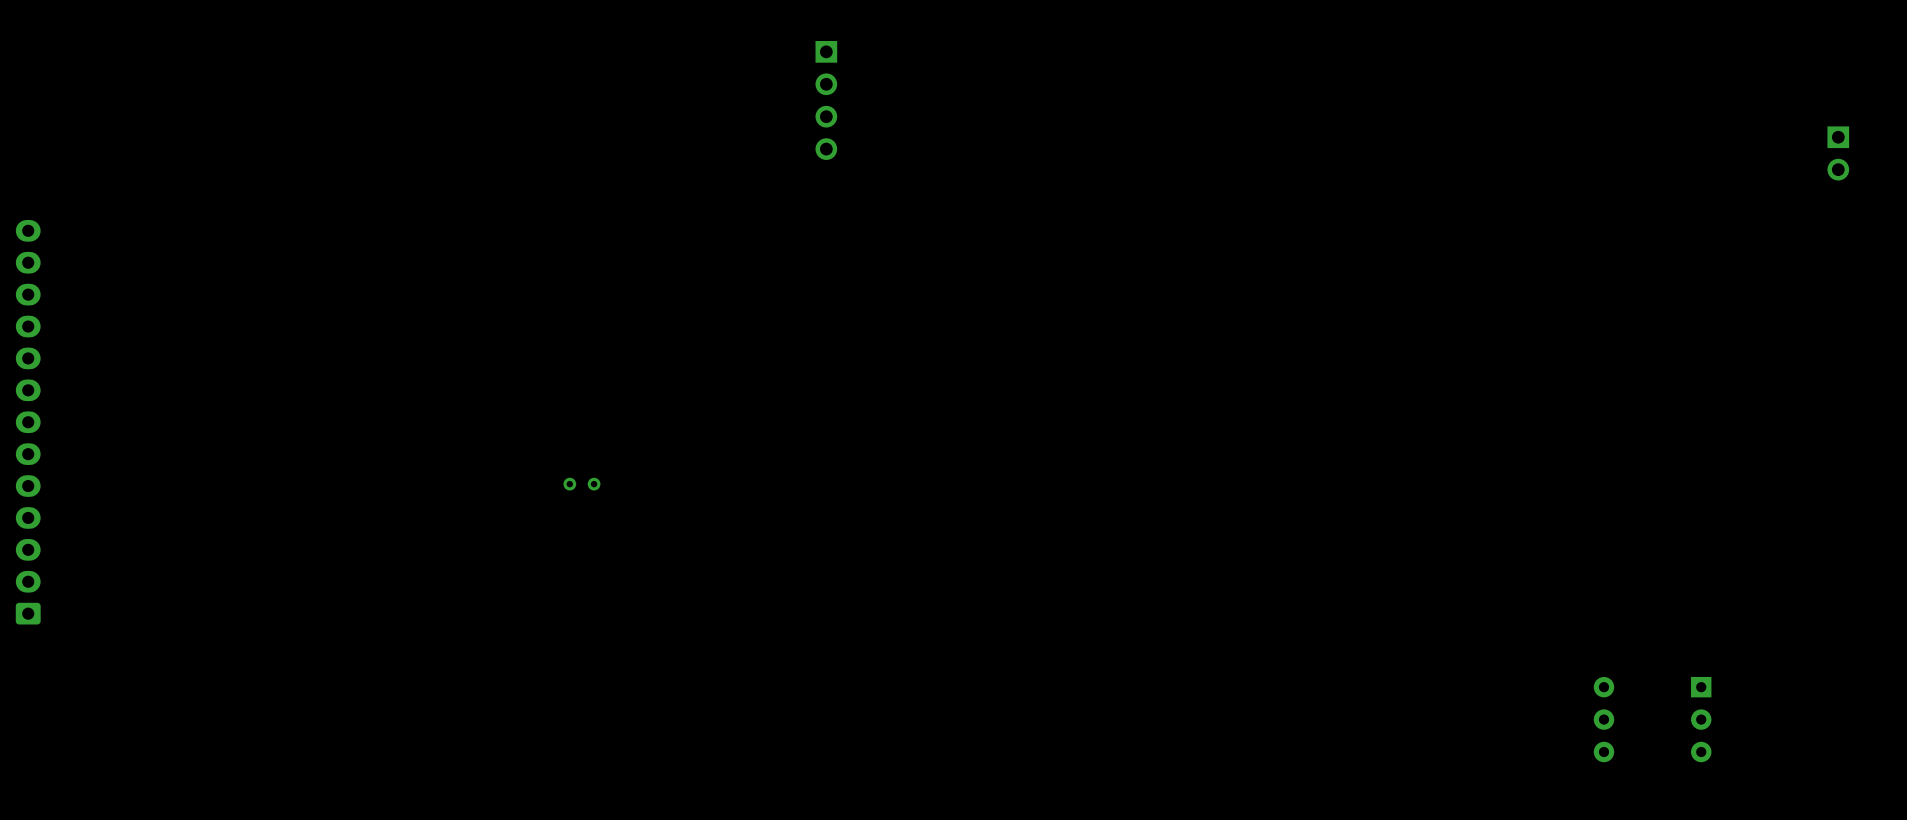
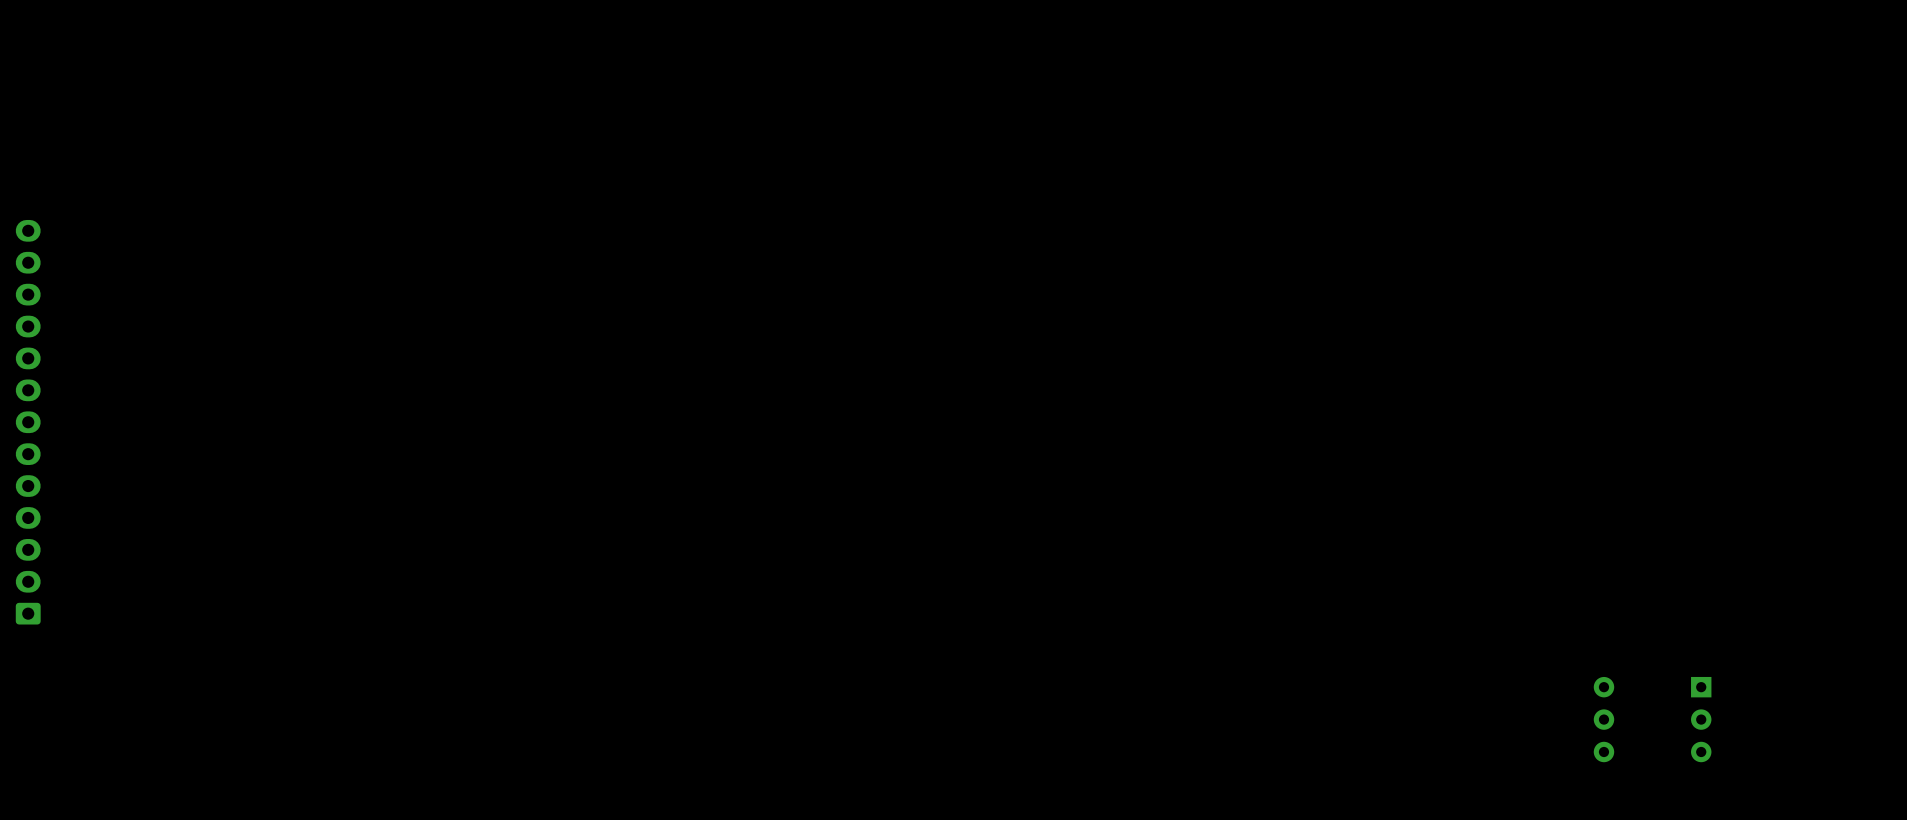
part: (826, 100) -> none
part: (1838, 153) -> none
part: (581, 484) -> none

